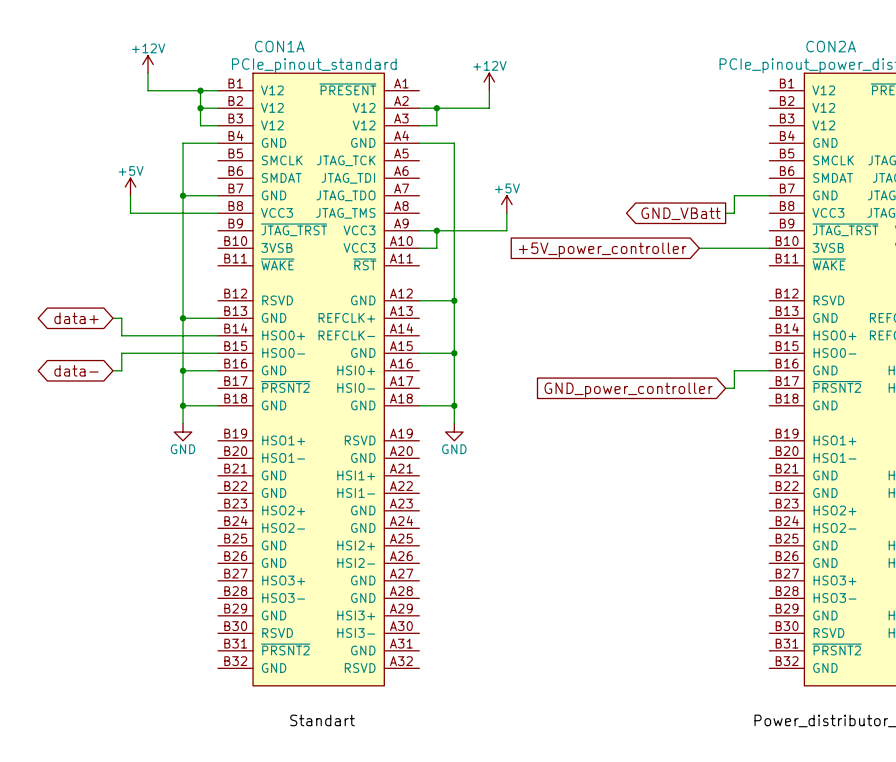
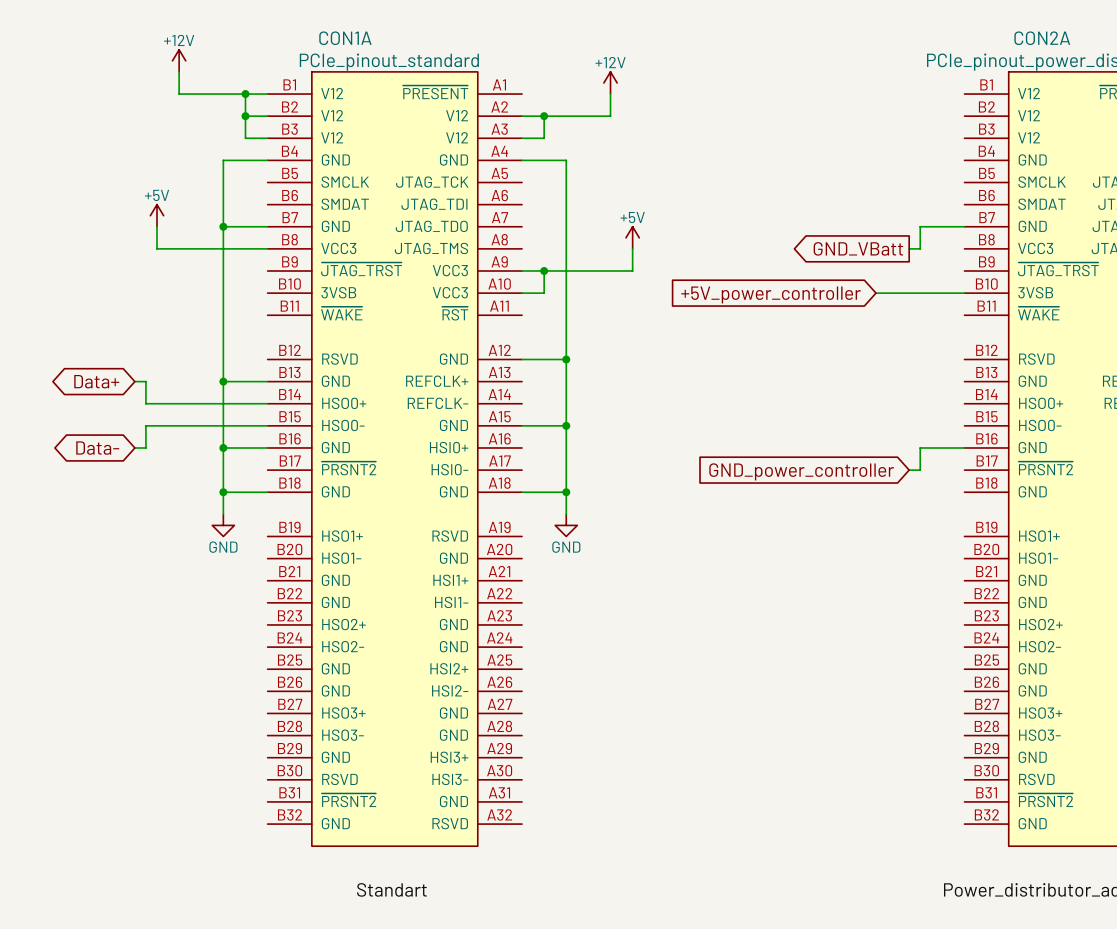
global label: data+ (76, 318) -> Data+ (96, 381)
global label: data- (76, 370) -> Data- (97, 448)

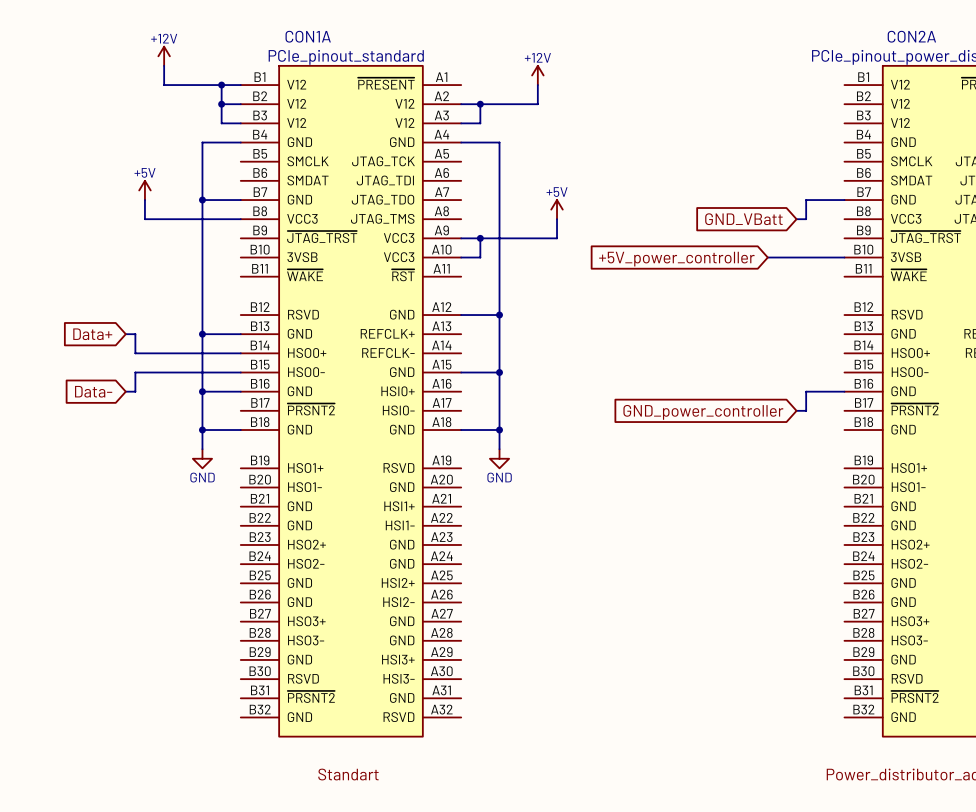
global label shape: output (858, 248) -> input (743, 219)
global label shape: bidirectional (96, 381) -> input (92, 334)
global label shape: bidirectional (97, 448) -> input (93, 391)

